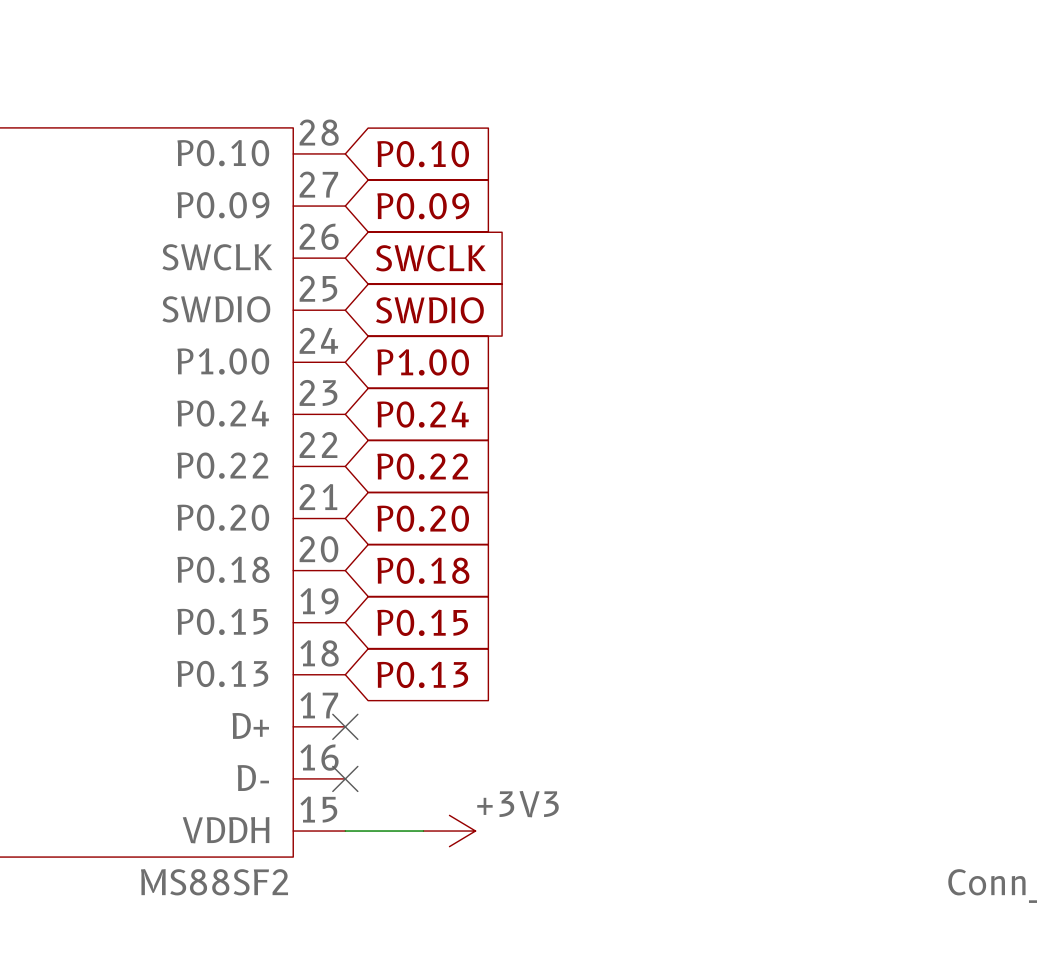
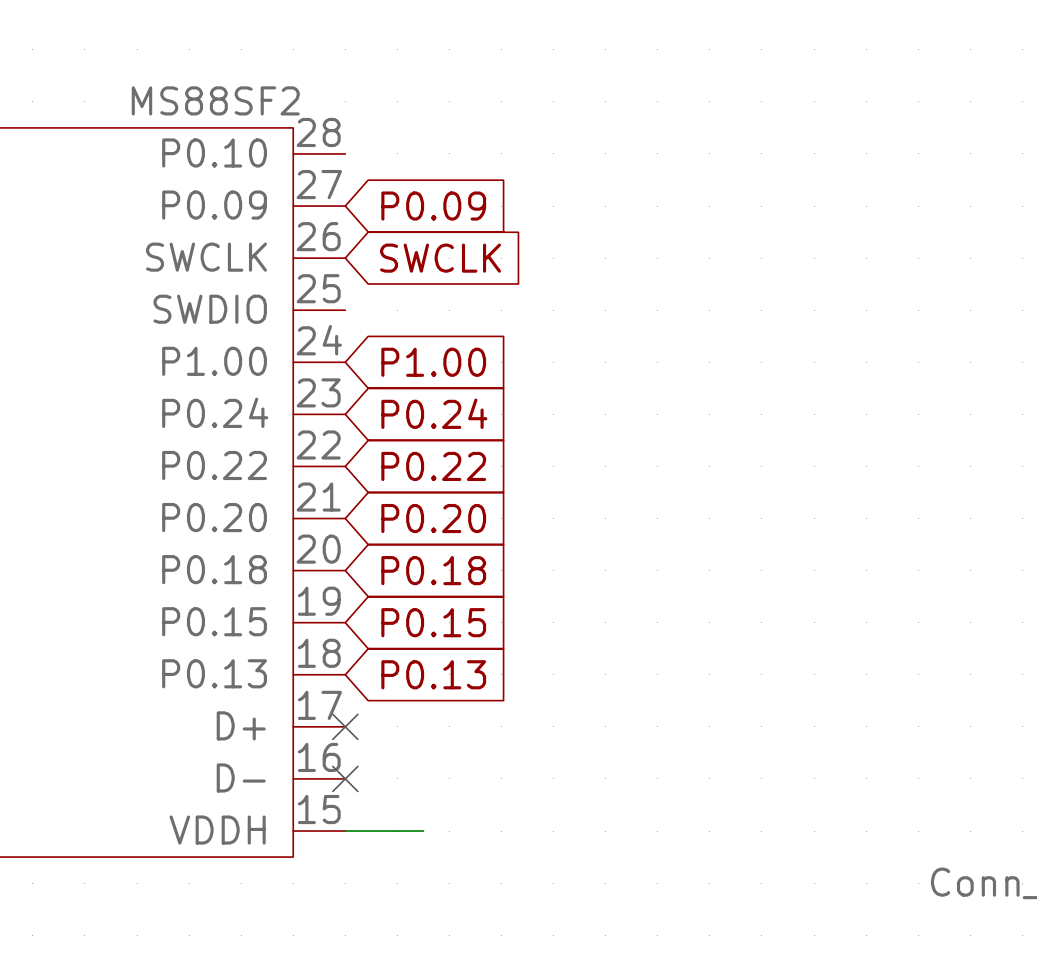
global label: P0.10 (423, 154) -> none
global label: SWDIO (429, 310) -> none
power symbol: +3V3 (449, 831) -> none
part value position: MS88SF2 (214, 882) -> MS88SF2 (215, 100)

